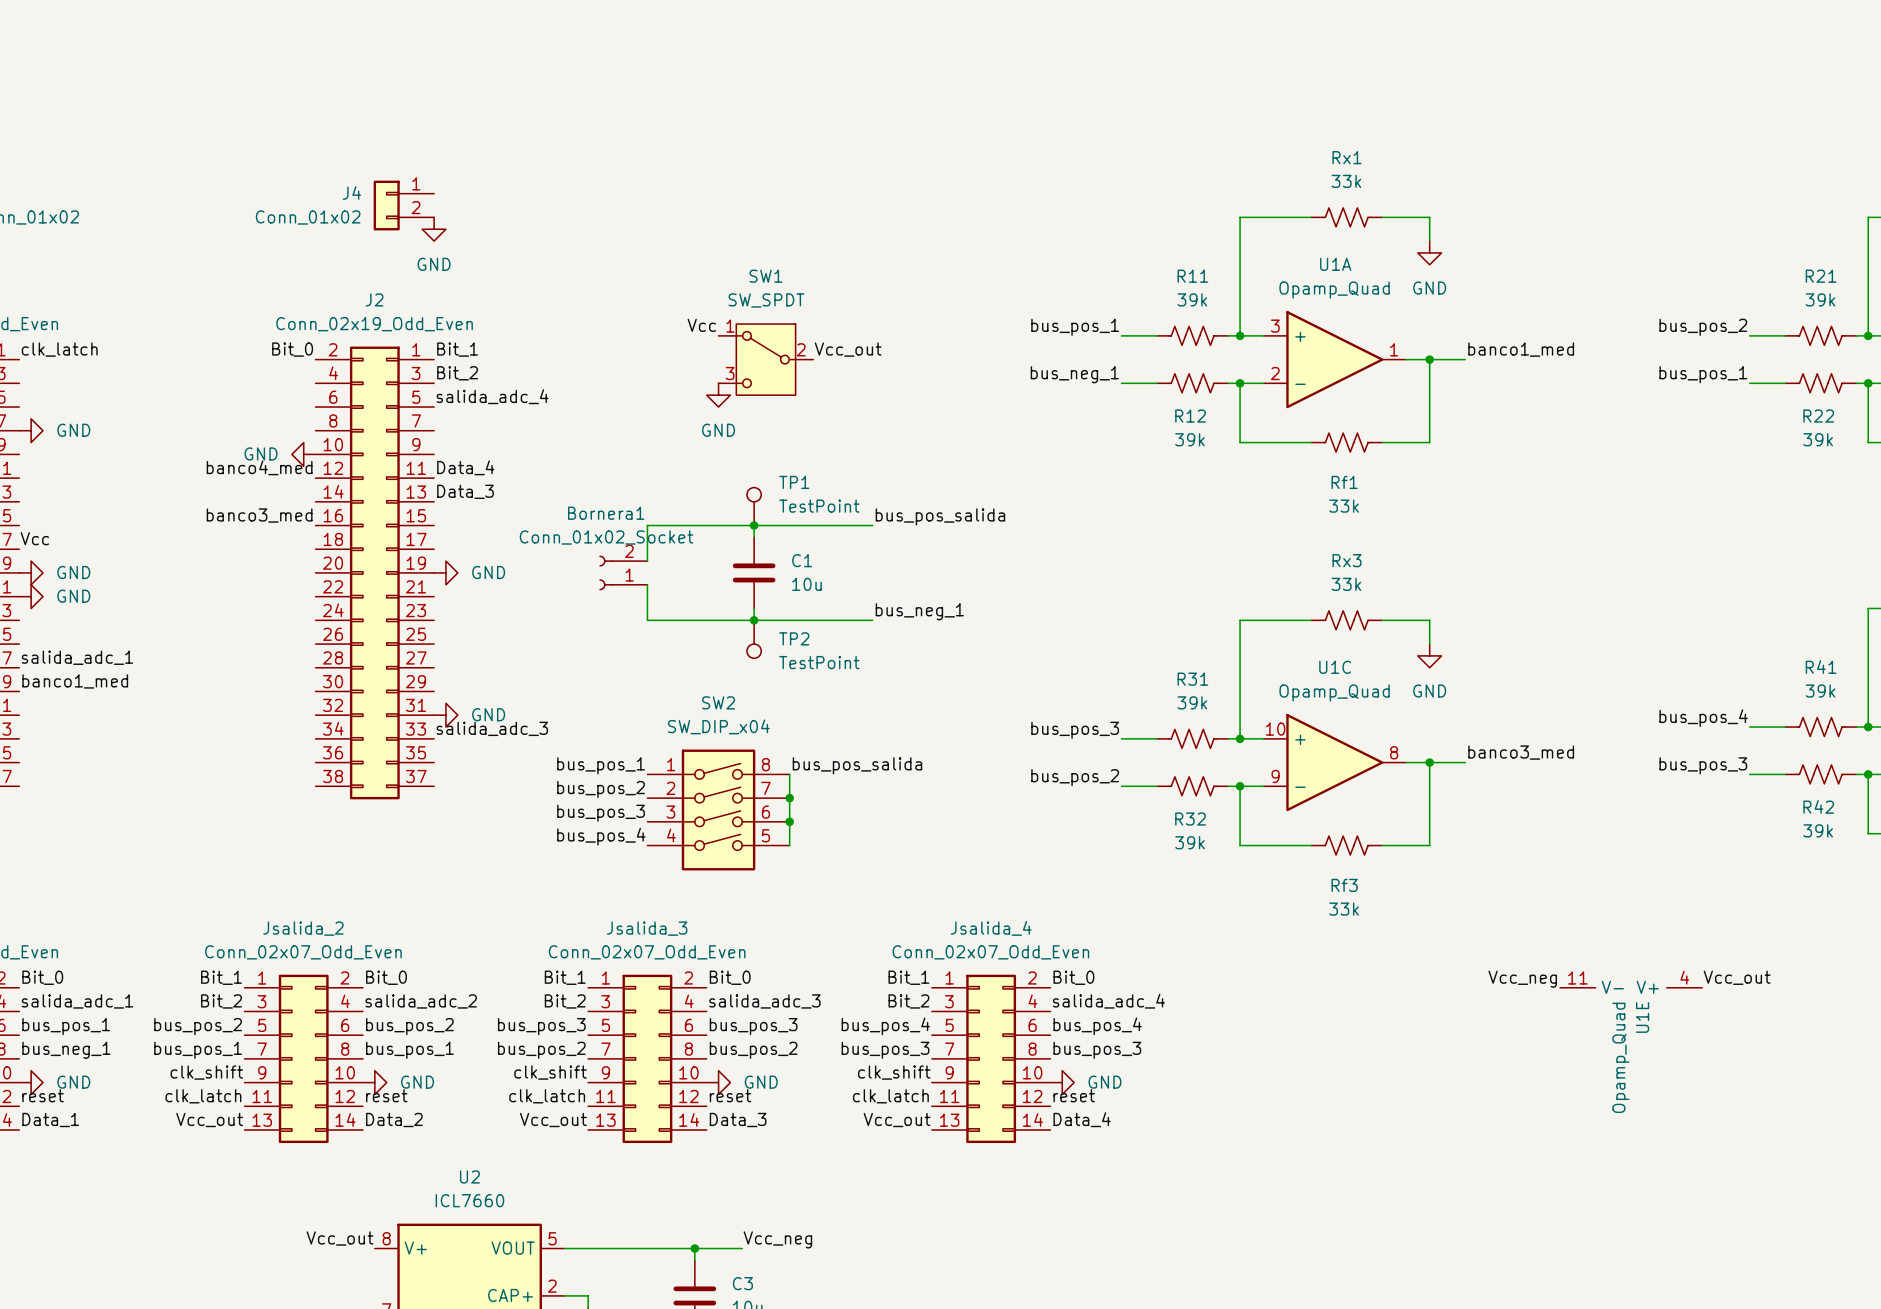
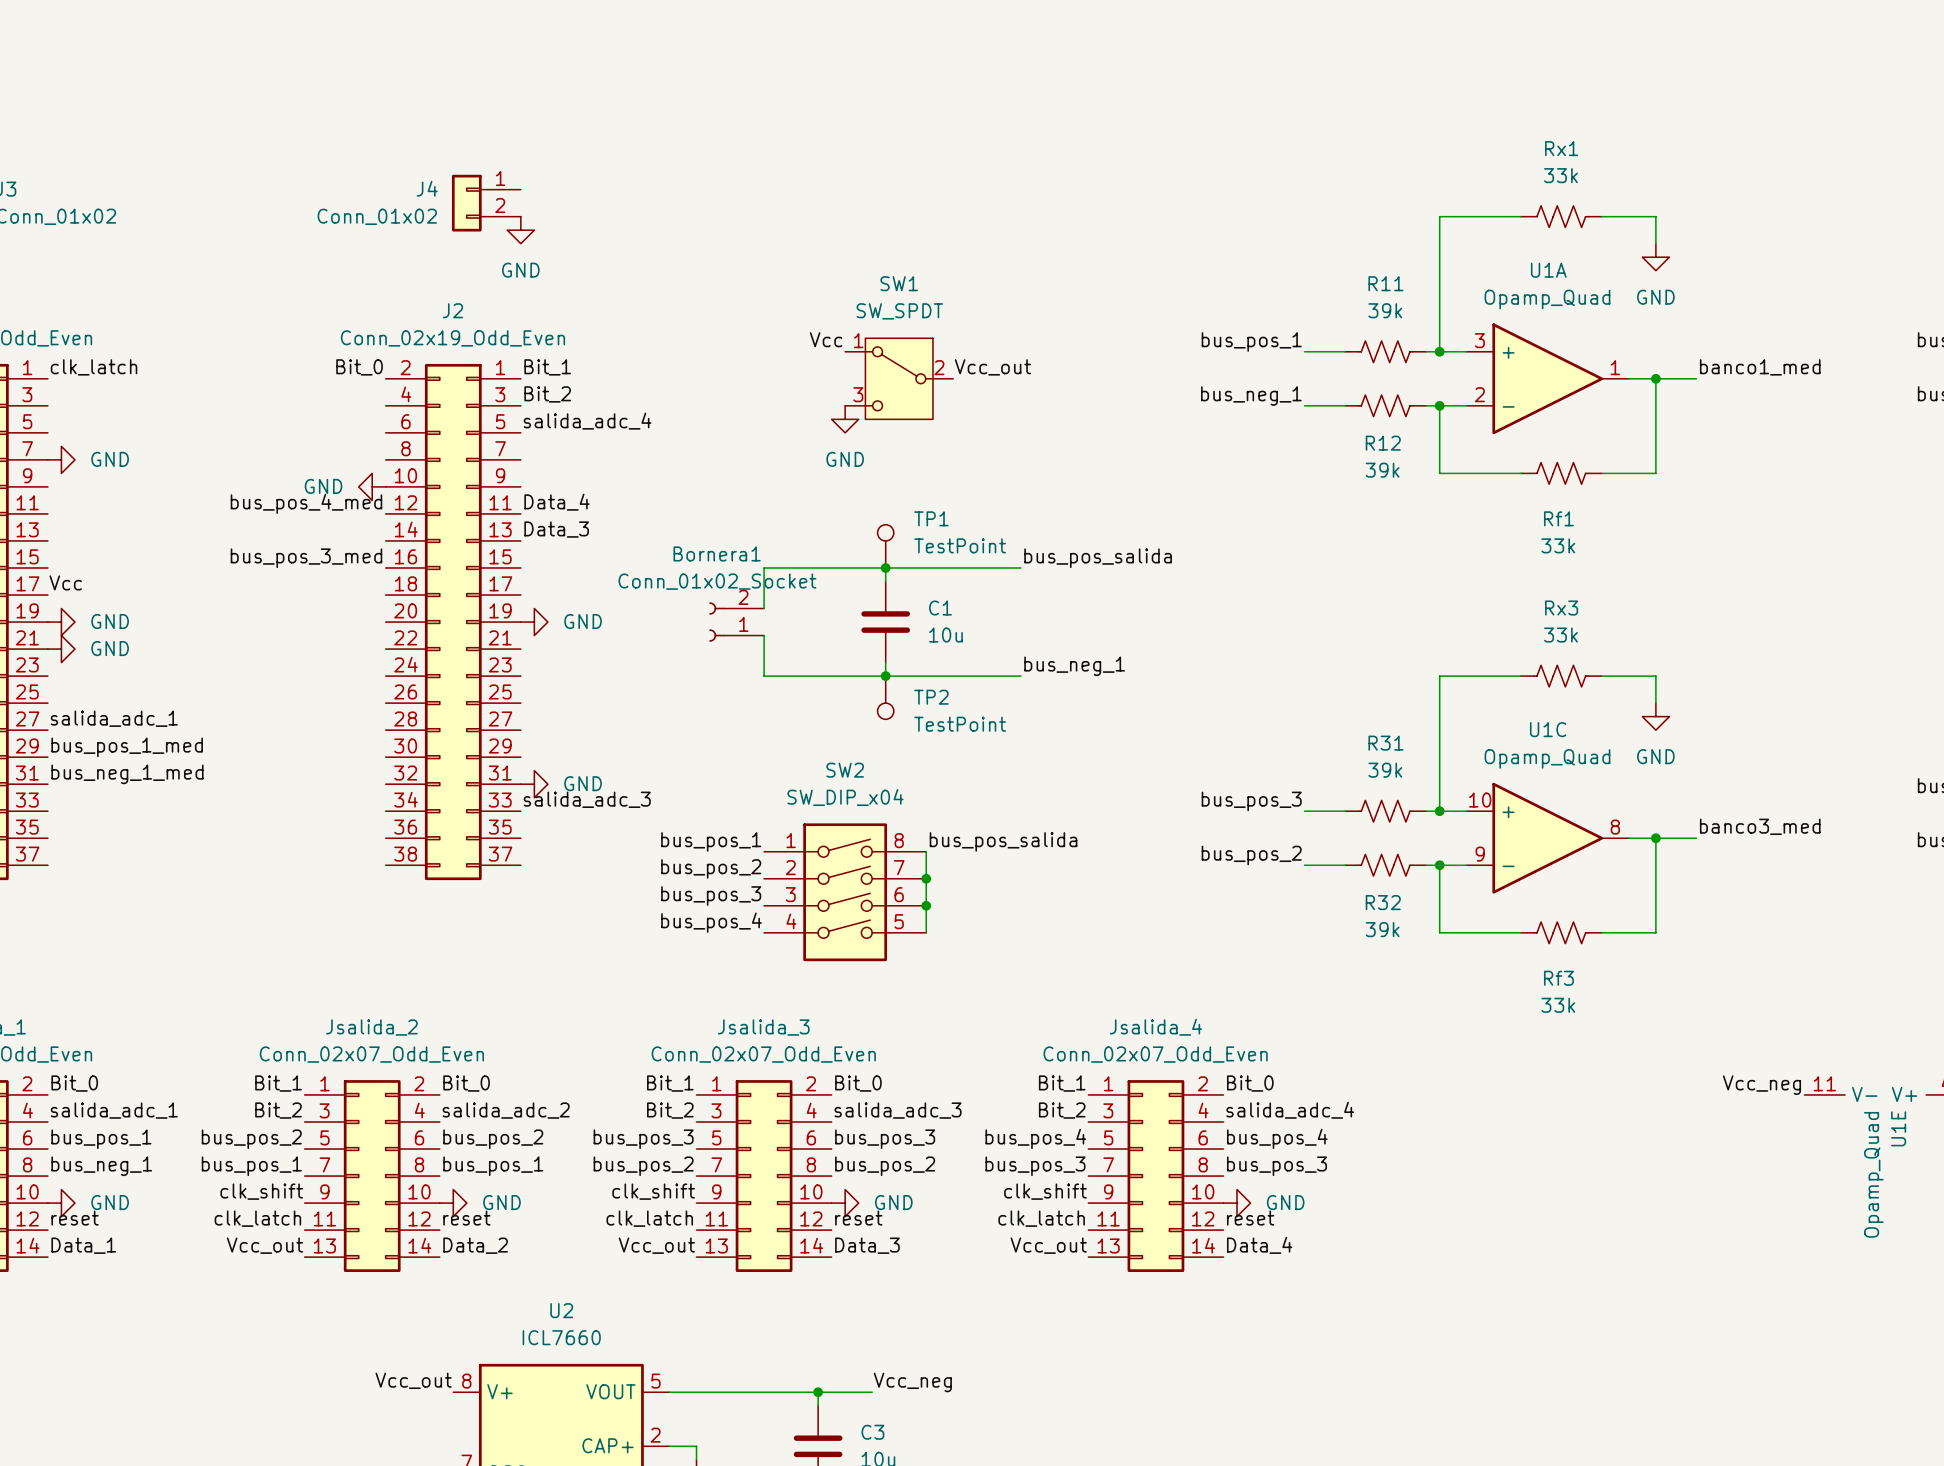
label: banco4_med (259, 467) -> bus_pos_4_med (306, 503)
label: banco3_med (259, 515) -> bus_pos_3_med (306, 558)
label: banco1_med (75, 681) -> bus_pos_1_med (127, 747)
label: none -> bus_neg_1_med (127, 774)

